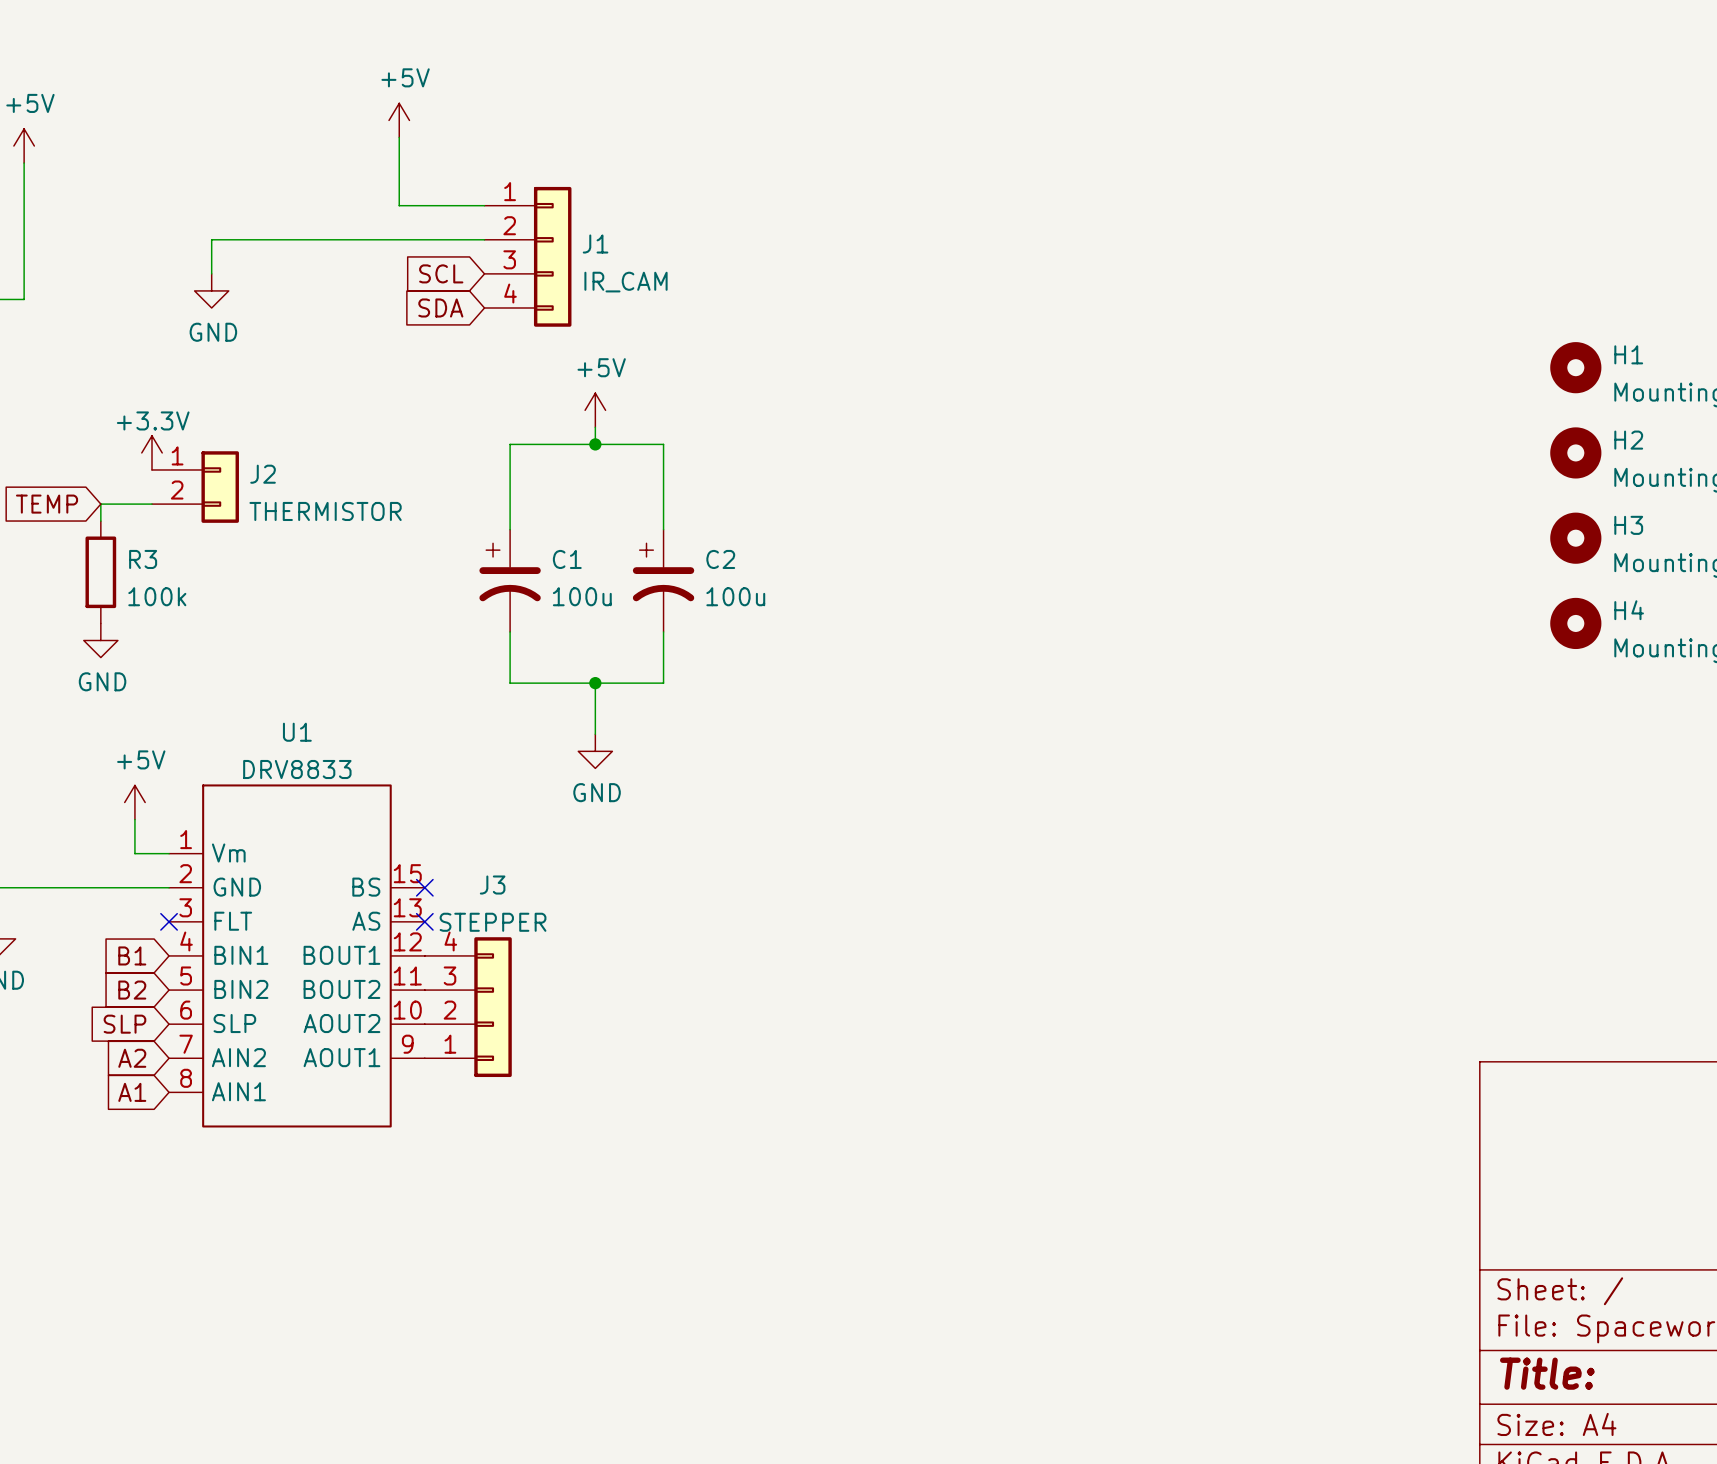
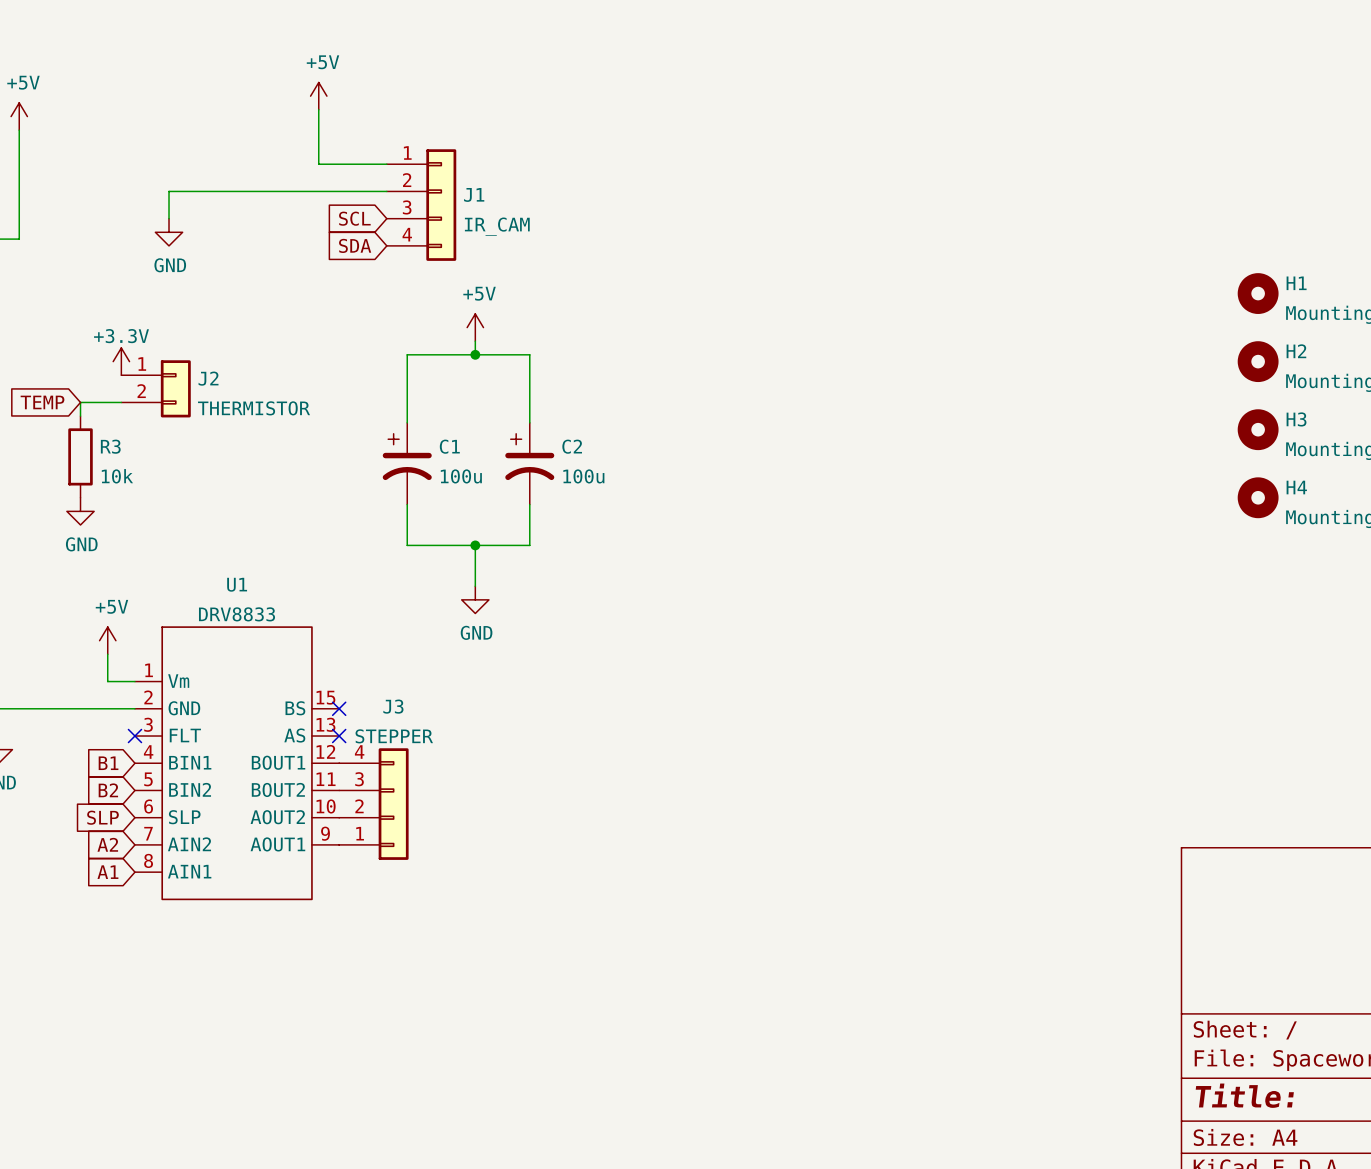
R3 value: 100k (157, 596) -> 10k (117, 476)

